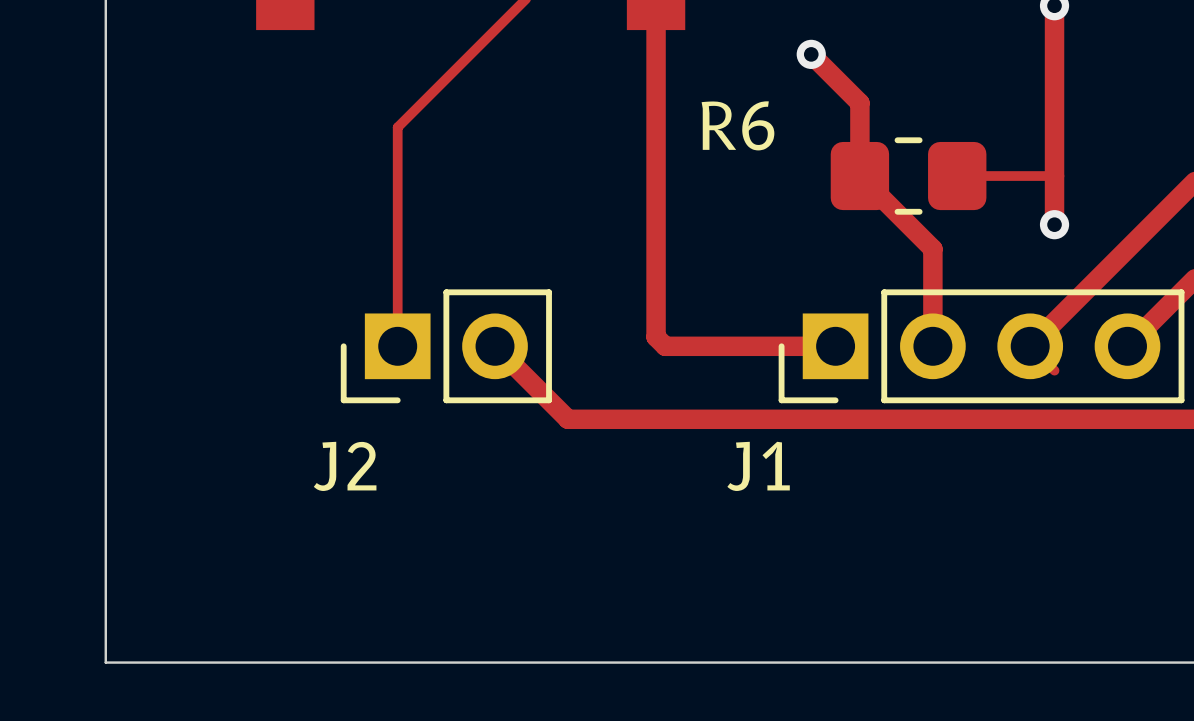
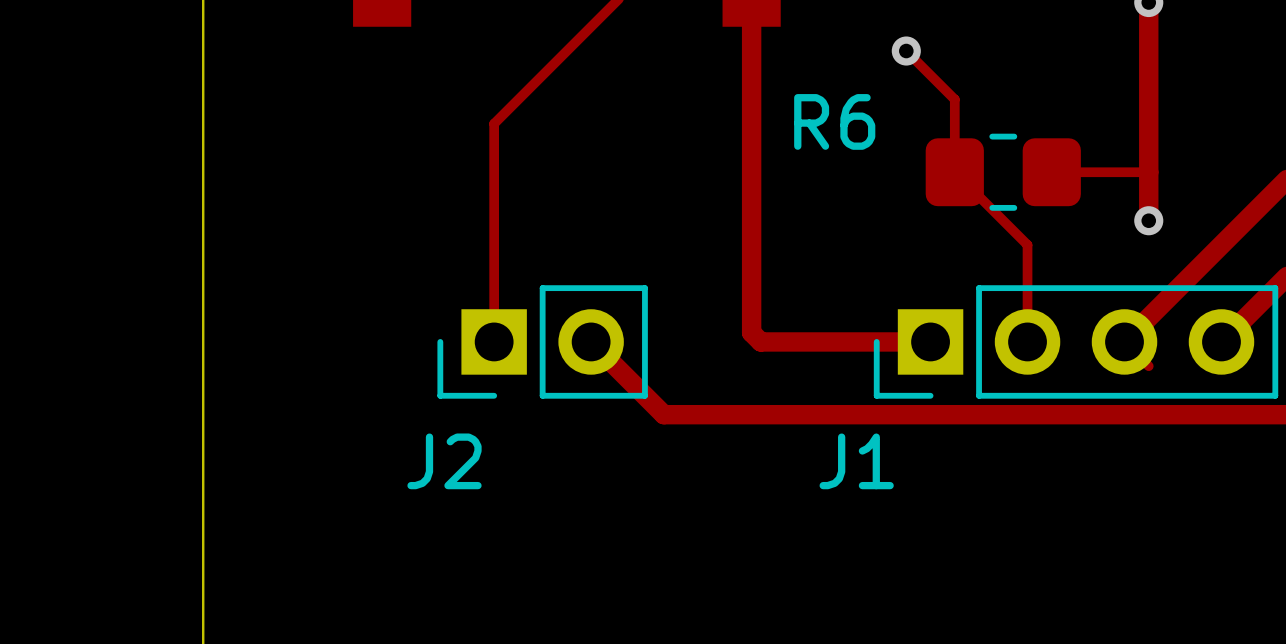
track width: thick (811, 54) (859, 103) (859, 176) (932, 249) (932, 346) -> thin (906, 51) (954, 99) (954, 172) (1027, 244) (1027, 341)

